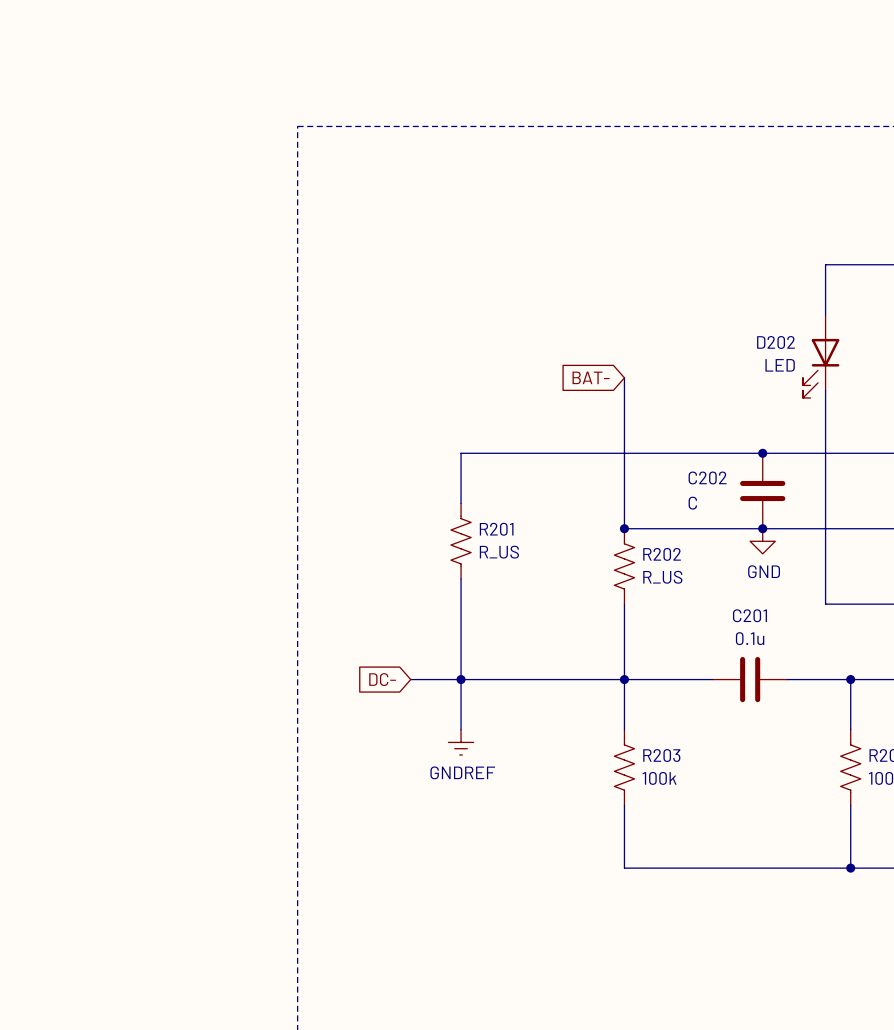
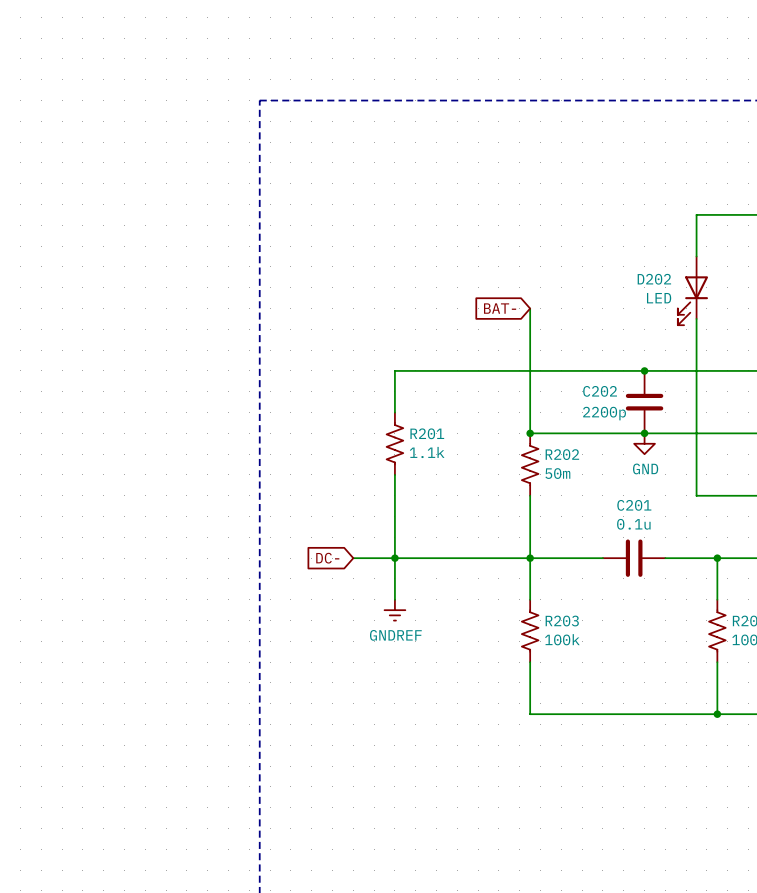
C202 value: C (692, 503) -> 2200p (604, 413)
R201 value: R_US (499, 552) -> 1.1k (427, 452)
R202 value: R_US (662, 577) -> 50m (557, 473)

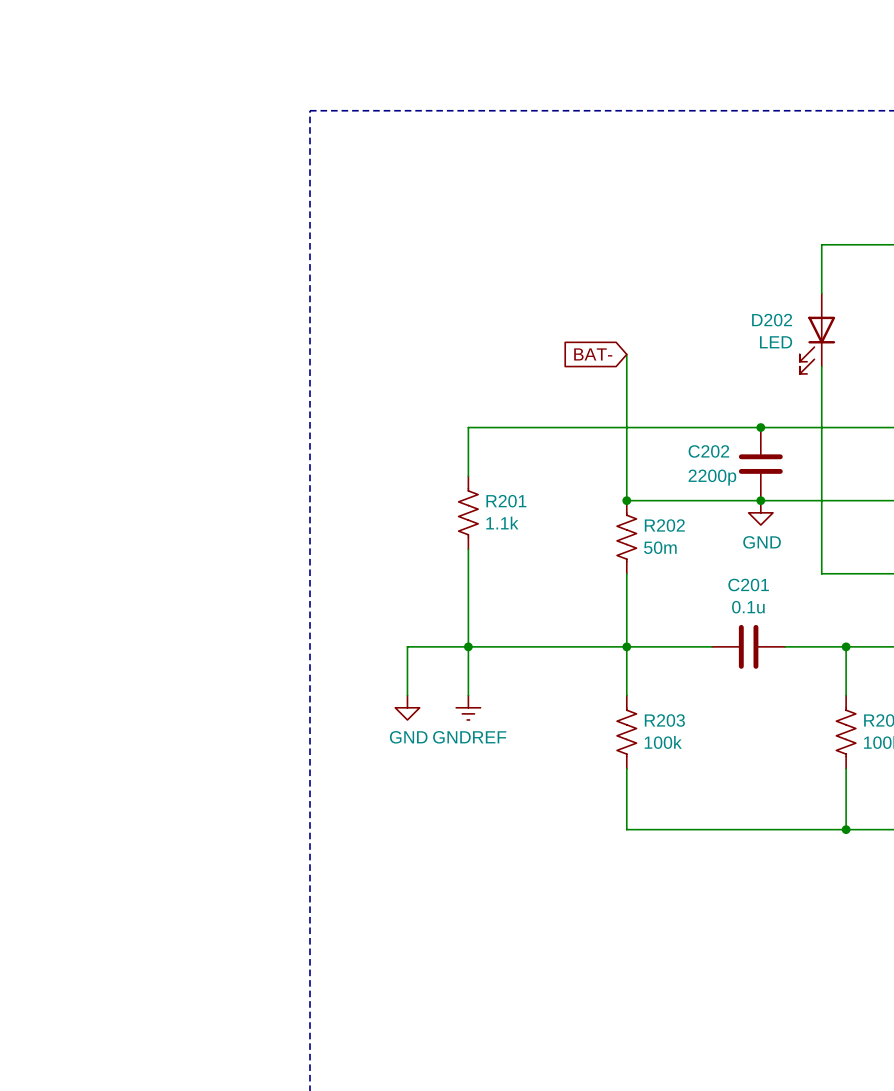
global label: DC- (327, 558) -> none
wire: none -> (419, 646) (407, 646) (407, 695)
power symbol: none -> GND (407, 707)

